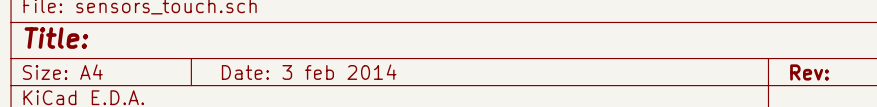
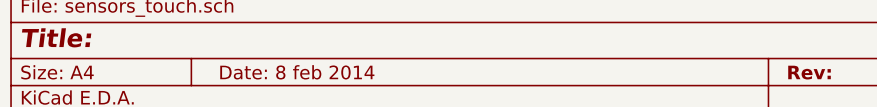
title block: Date: 3 feb 2014 (309, 72) -> Date: 8 feb 2014 (297, 72)

